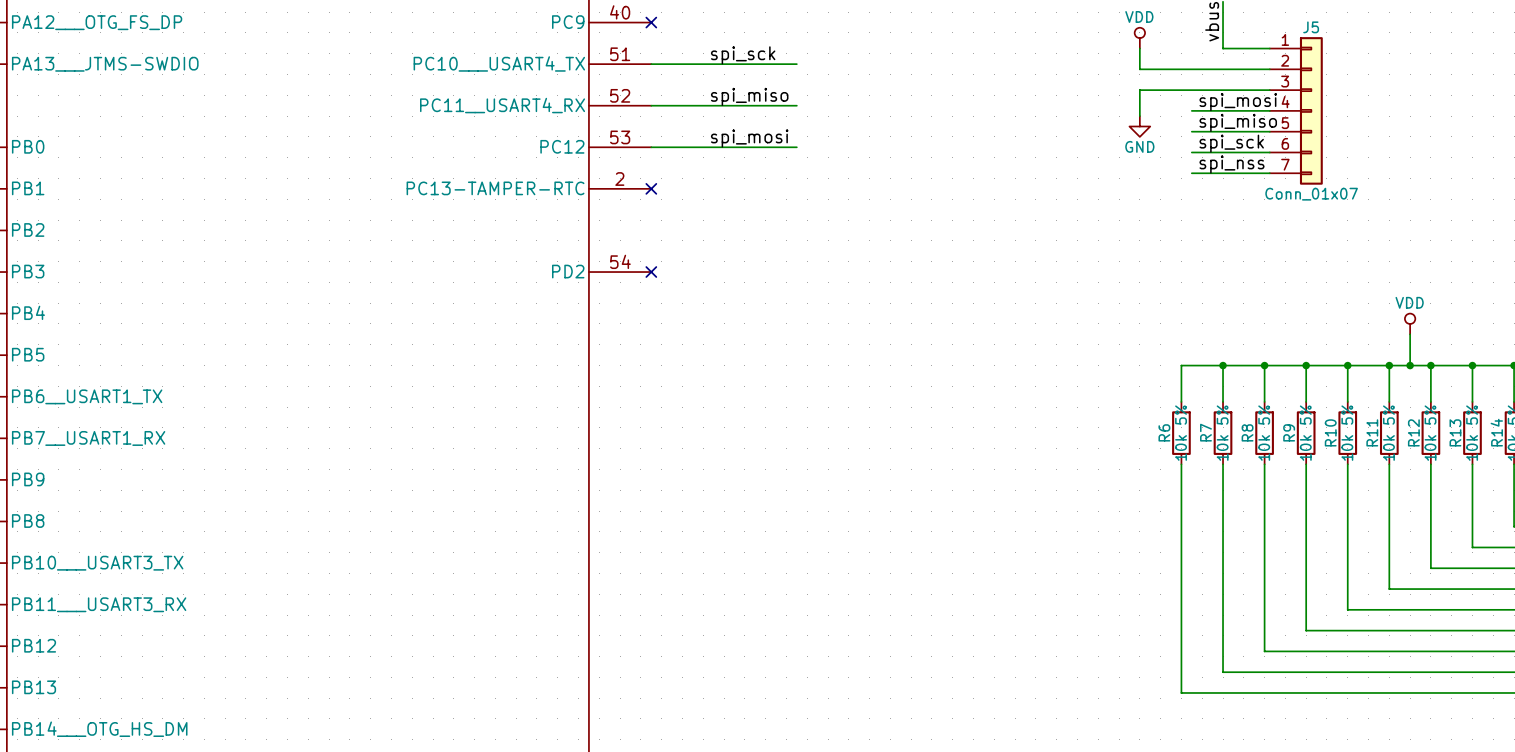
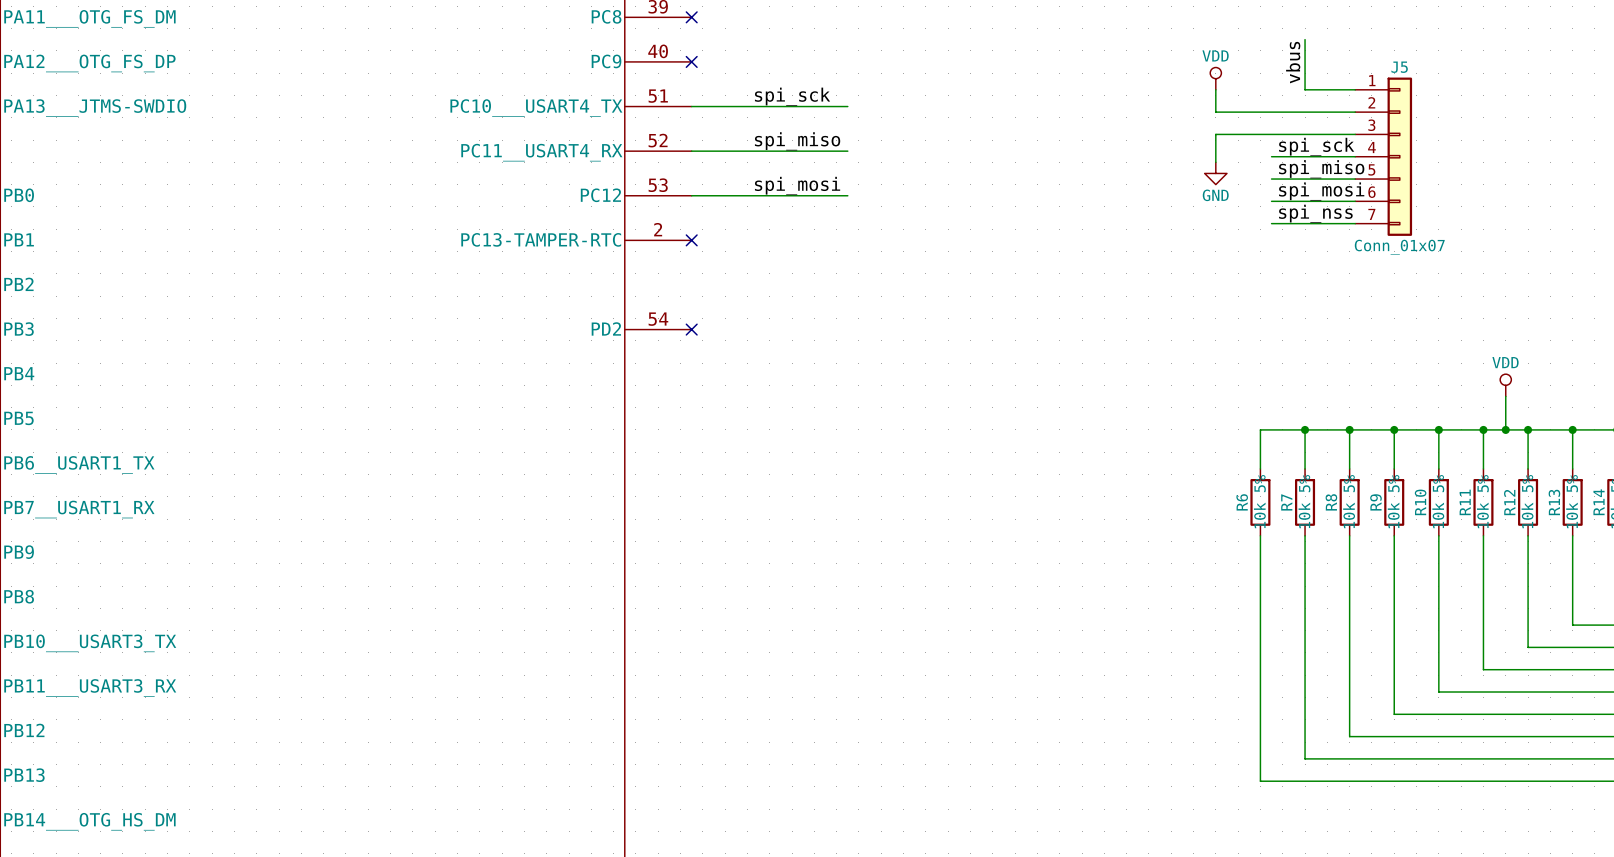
label: spi_mosi (1238, 102) -> spi_sck (1316, 146)
label: spi_sck (1231, 143) -> spi_mosi (1321, 191)

